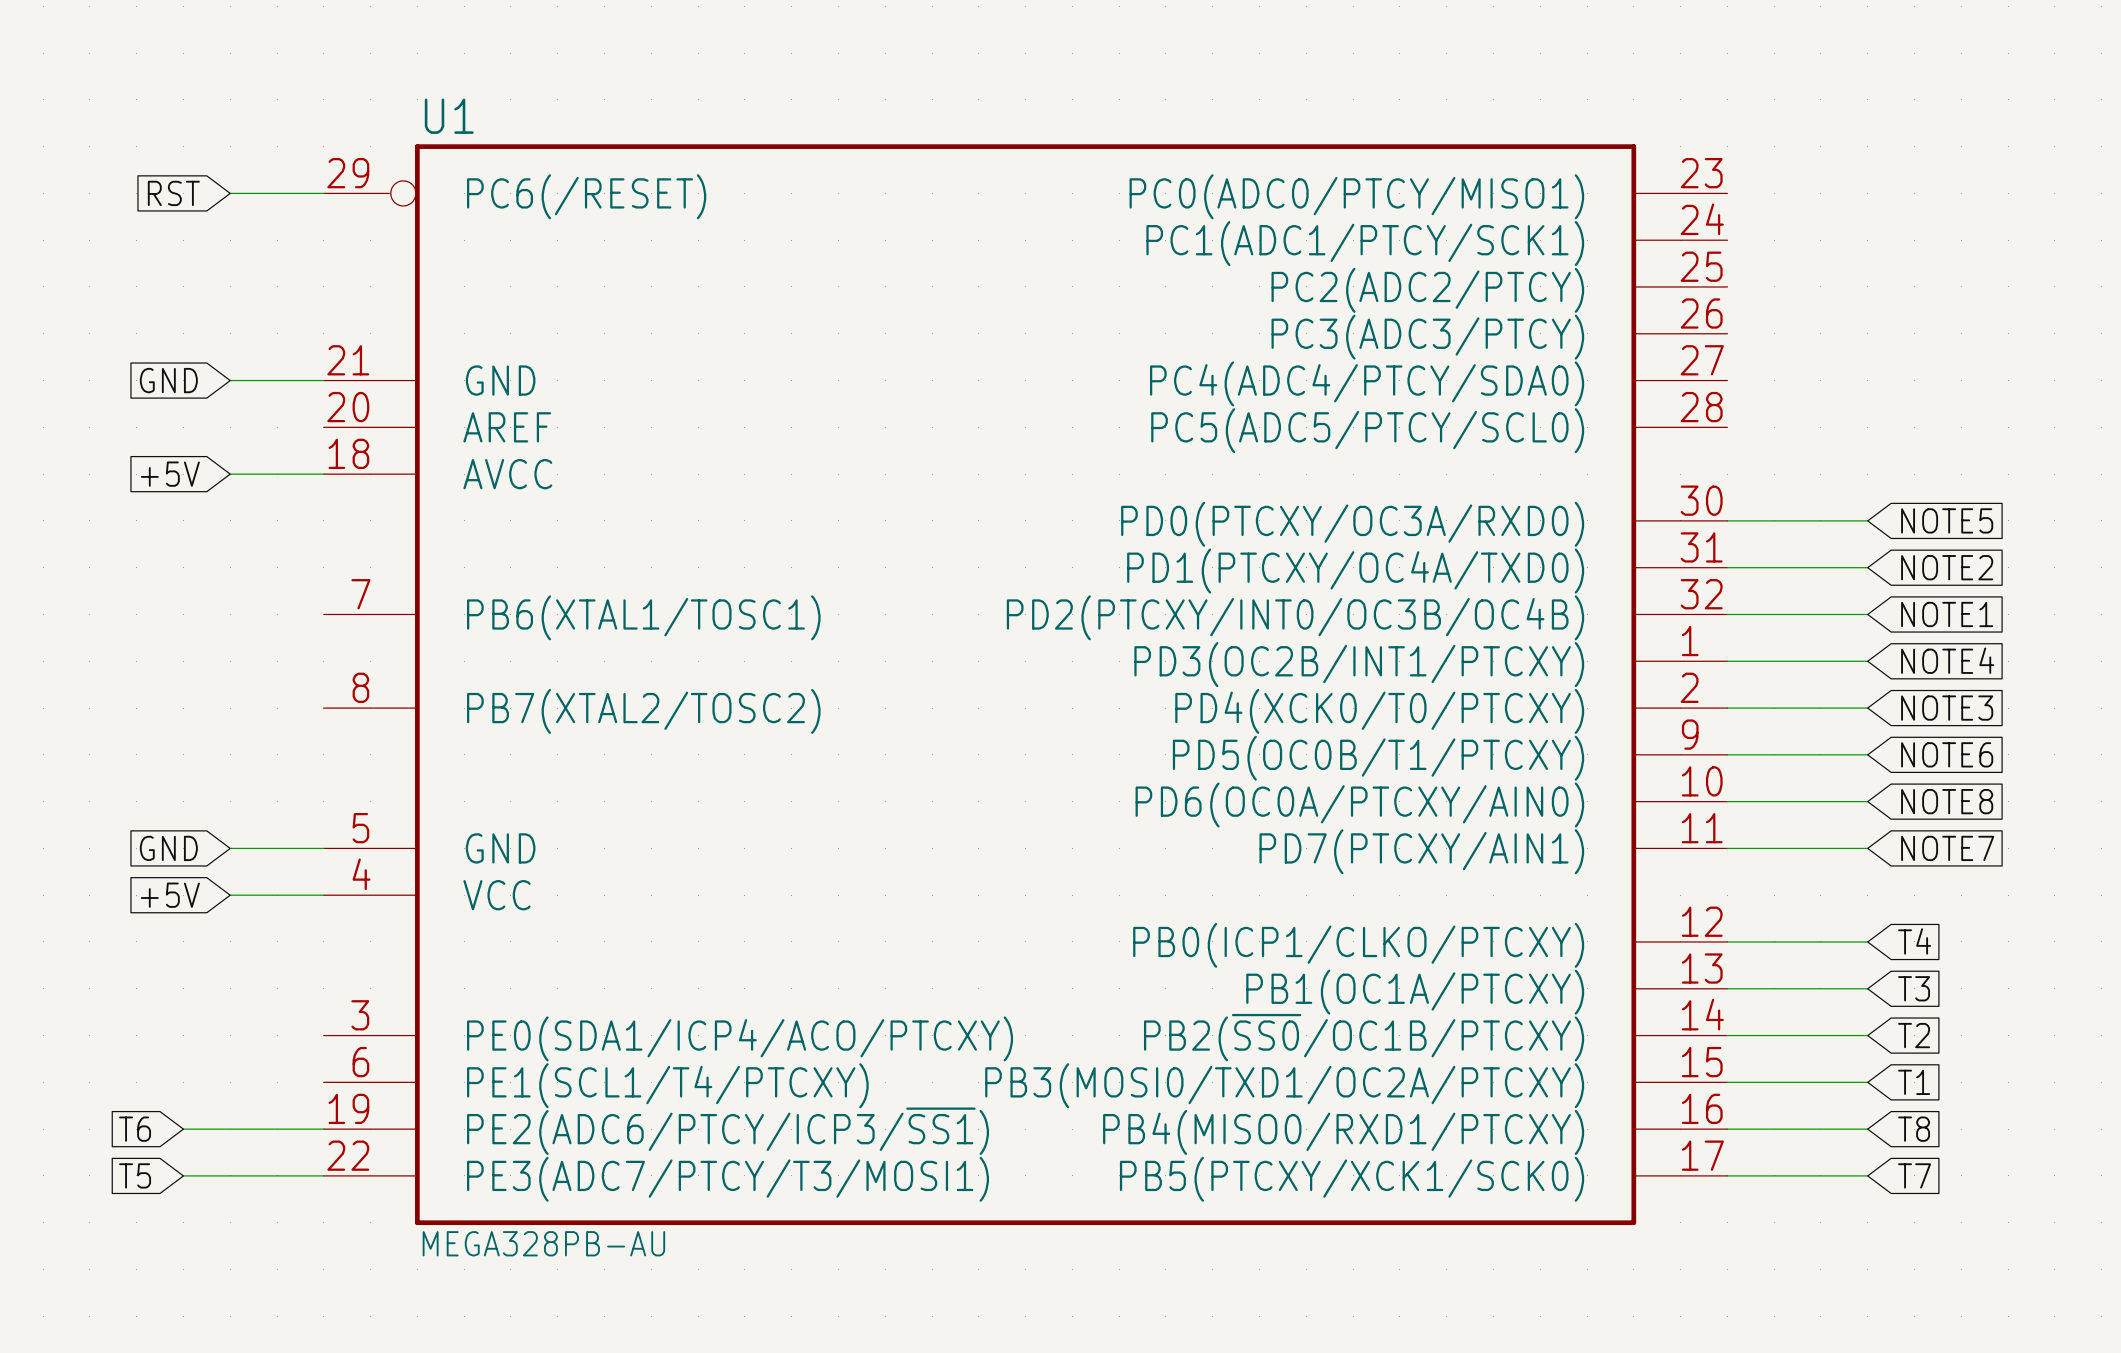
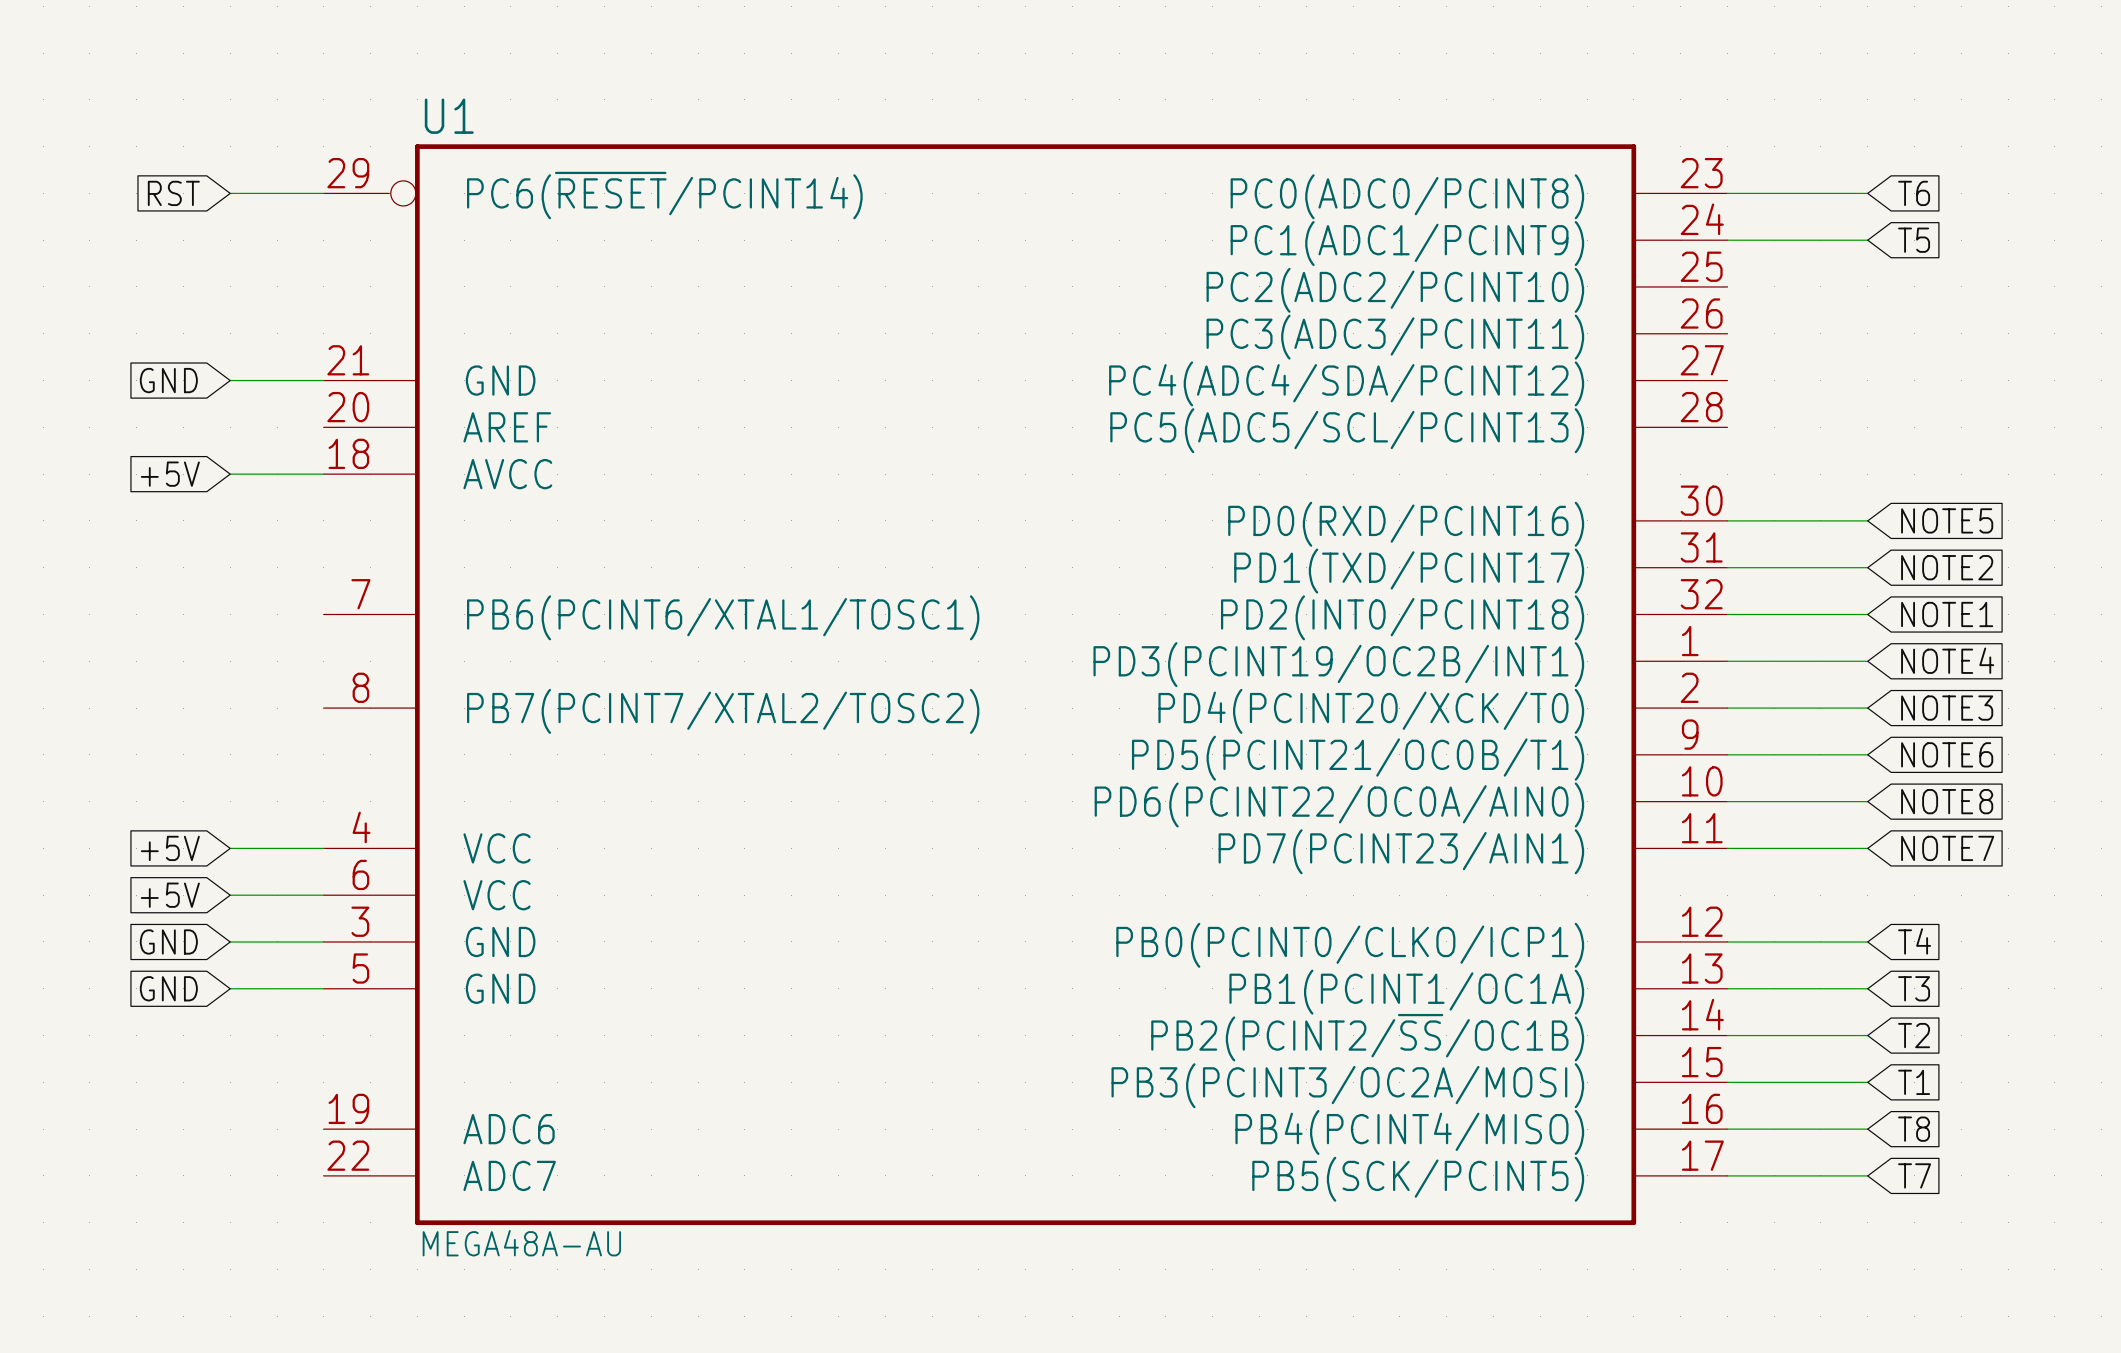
U1 symbol: [323, 144, 1728, 1226] -> [323, 144, 1728, 1226]
wire: none -> (1727, 193) (1867, 193)
global label: none -> T6 (1914, 193)
wire: none -> (1727, 240) (1867, 240)
global label: none -> T5 (1914, 240)
global label: GND (168, 848) -> +5V (170, 848)
global label: none -> GND (168, 941)
wire: none -> (230, 941) (323, 941)
global label: none -> GND (168, 988)
wire: none -> (230, 988) (323, 988)
global label: T6 (135, 1129) -> none
wire: (183, 1129) (323, 1129) -> none
global label: T5 (135, 1175) -> none
wire: (183, 1175) (323, 1175) -> none
U1 value: MEGA328PB-AU (543, 1243) -> MEGA48A-AU (521, 1243)

